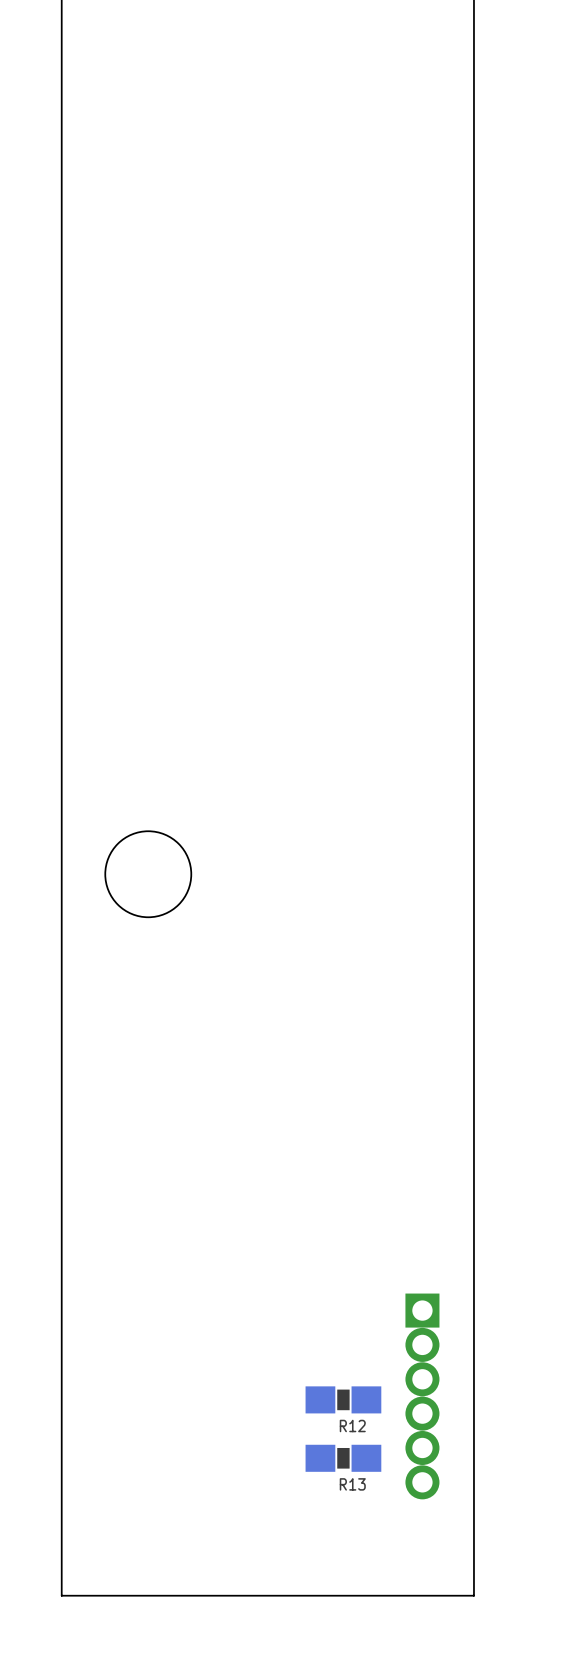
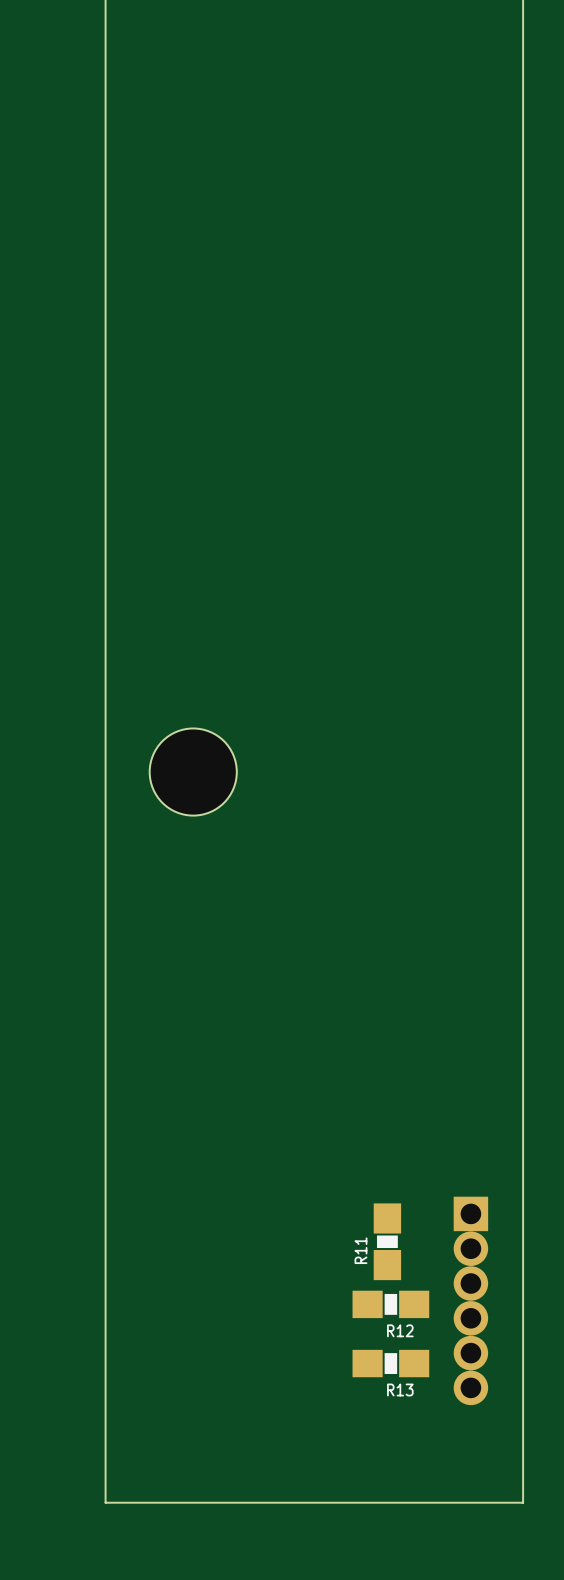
R11: none -> (387, 1241)

